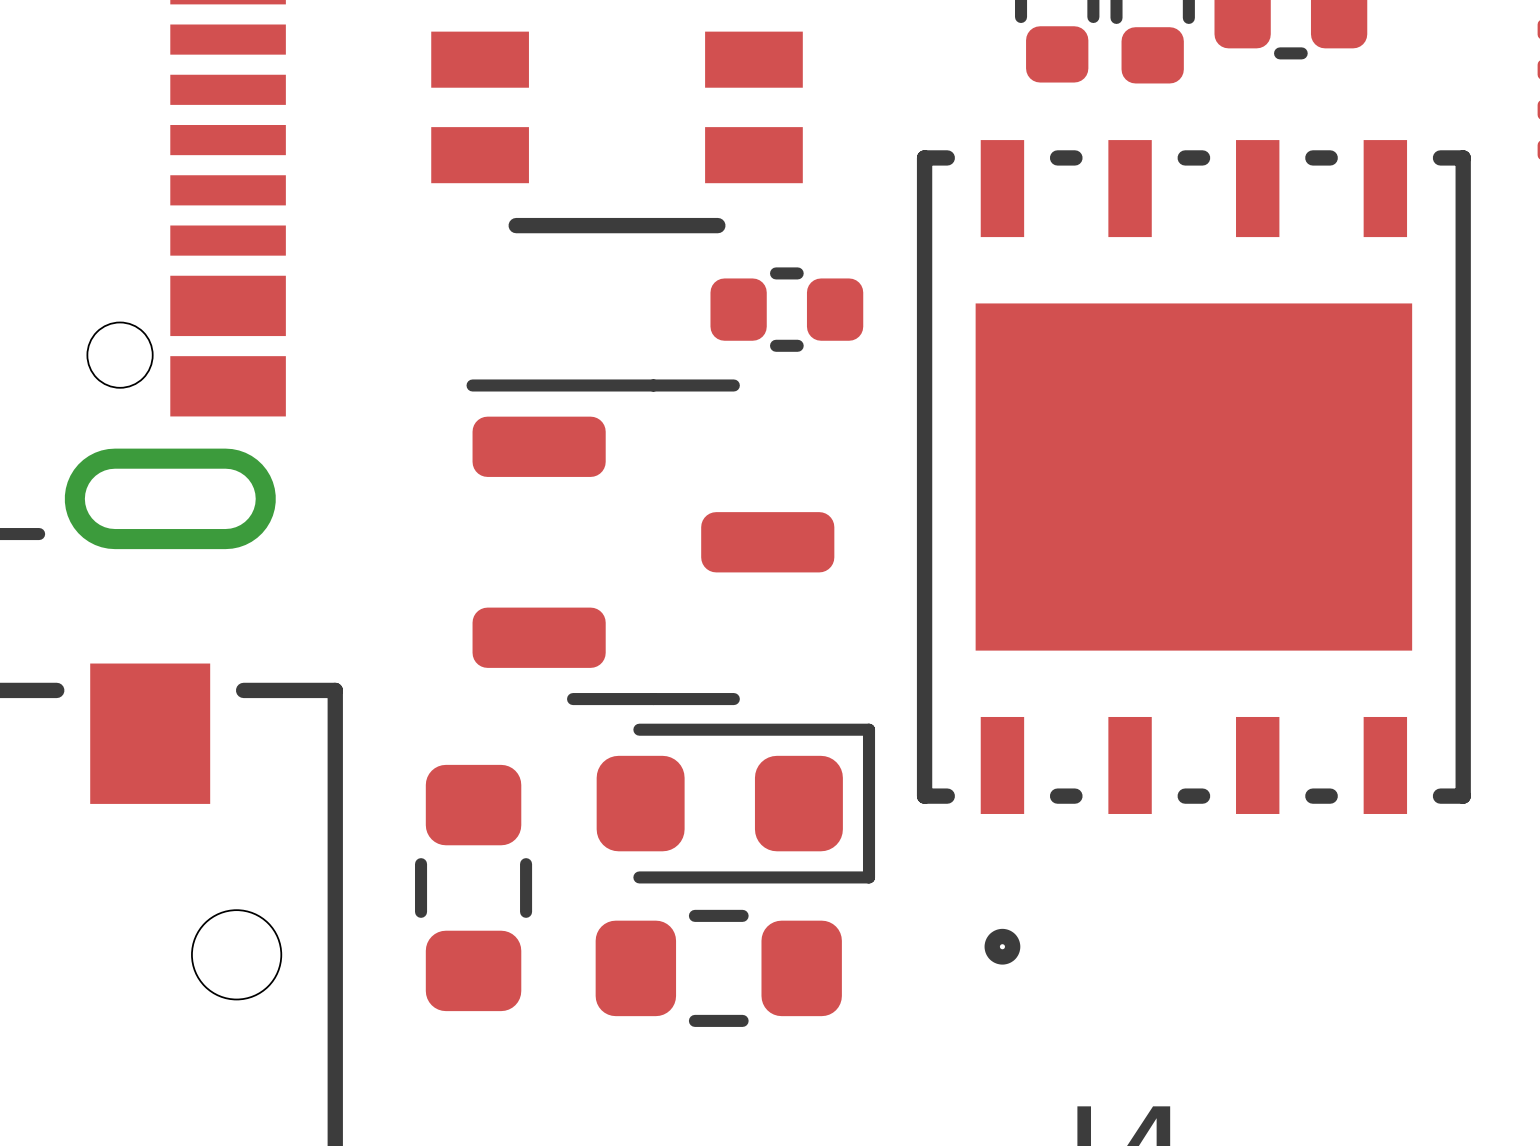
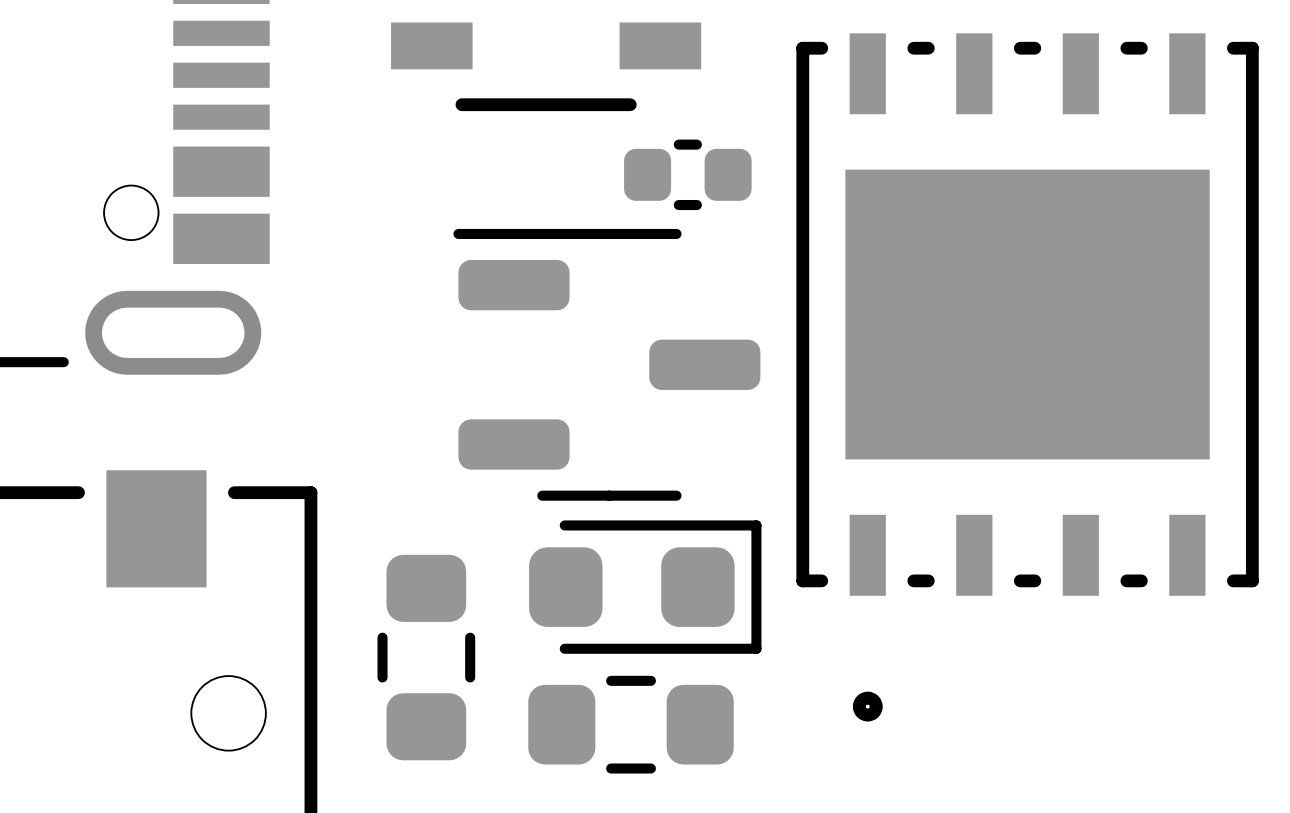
part position: (650, 542) -> (606, 364)

